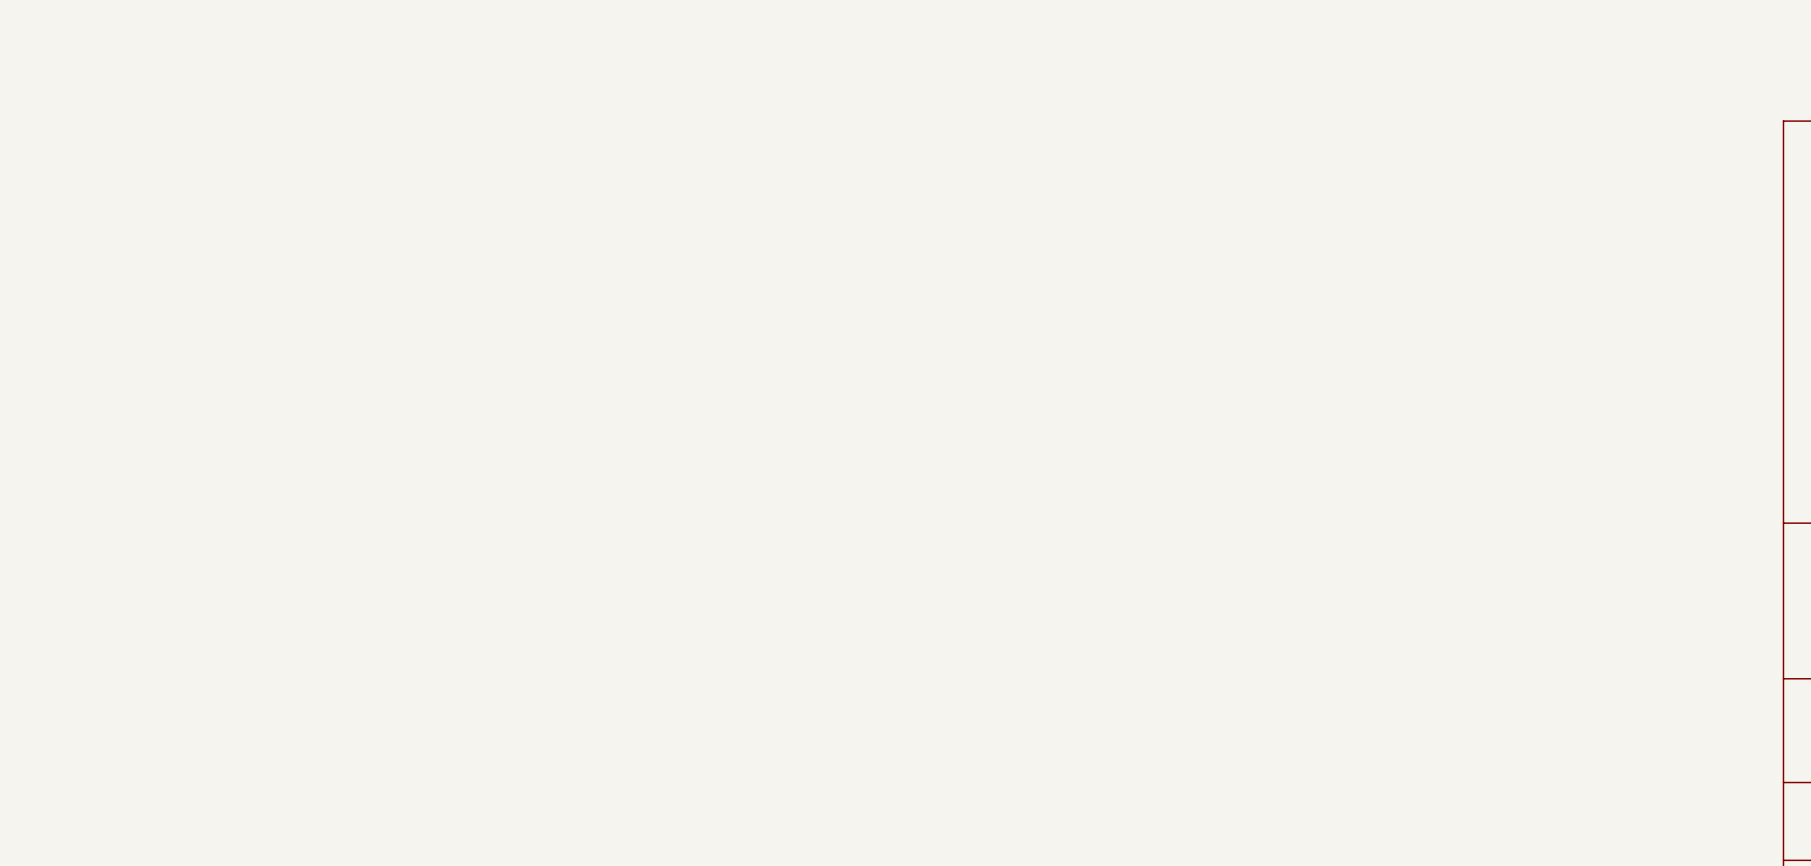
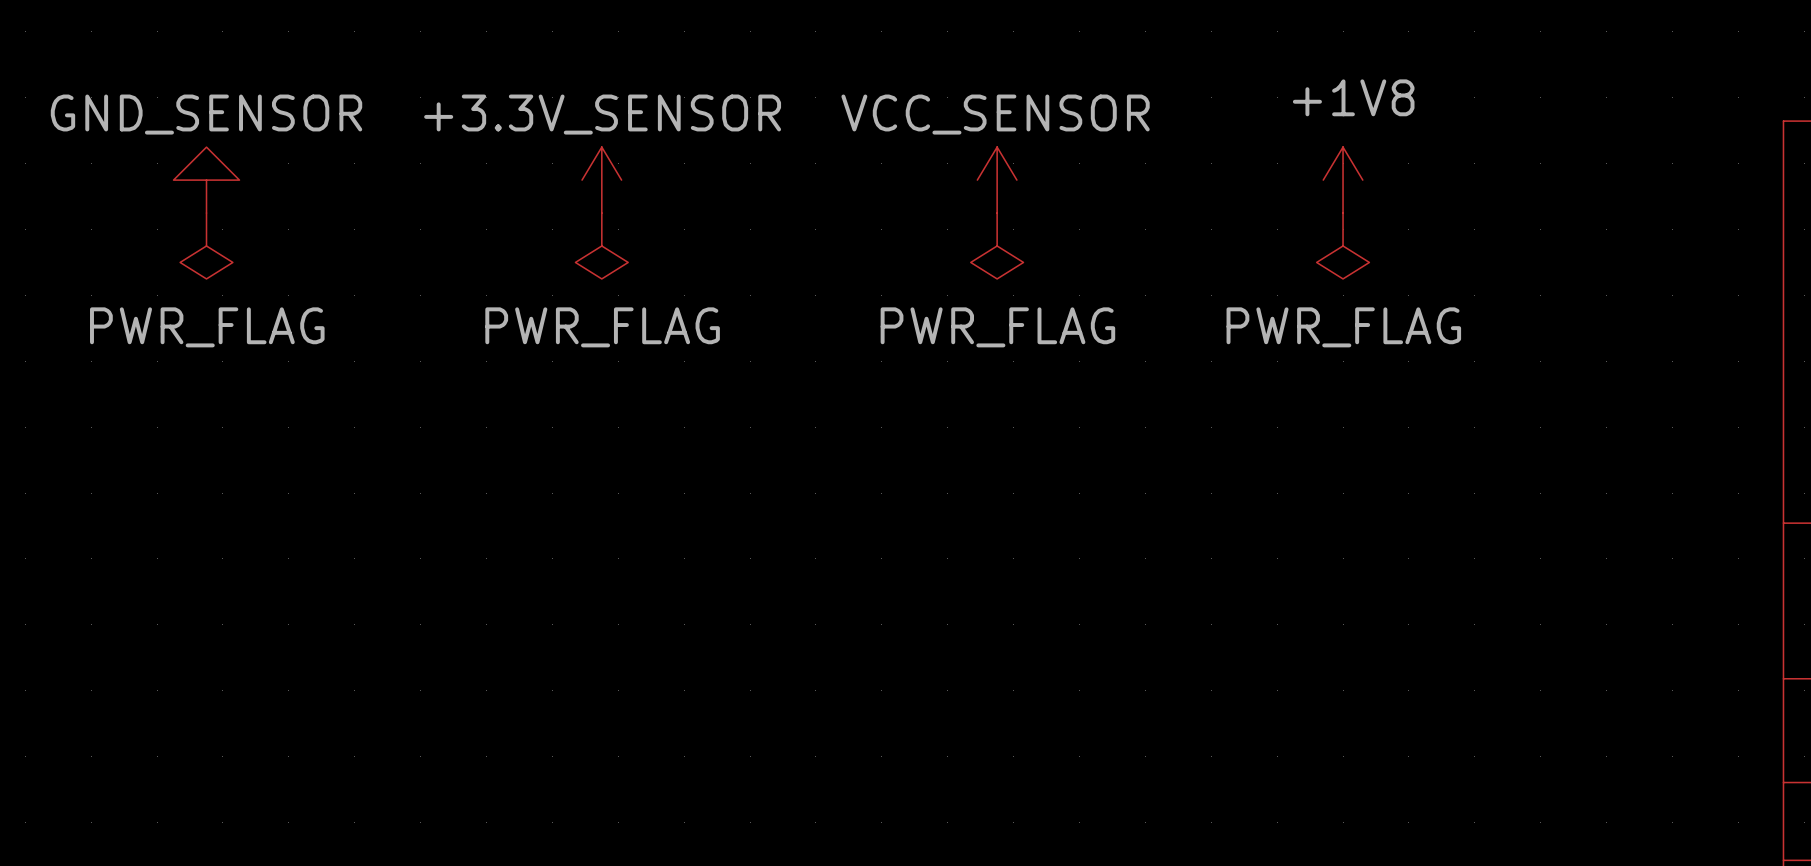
power symbol: none -> GND_SENSOR (206, 180)
power symbol: none -> +3.3V_SENSOR (601, 180)
power symbol: none -> VCC_SENSOR (997, 180)
power symbol: none -> +1V8 (1343, 180)
power symbol: none -> PWR_FLAG (206, 245)
power symbol: none -> PWR_FLAG (601, 245)
power symbol: none -> PWR_FLAG (997, 245)
power symbol: none -> PWR_FLAG (1343, 245)

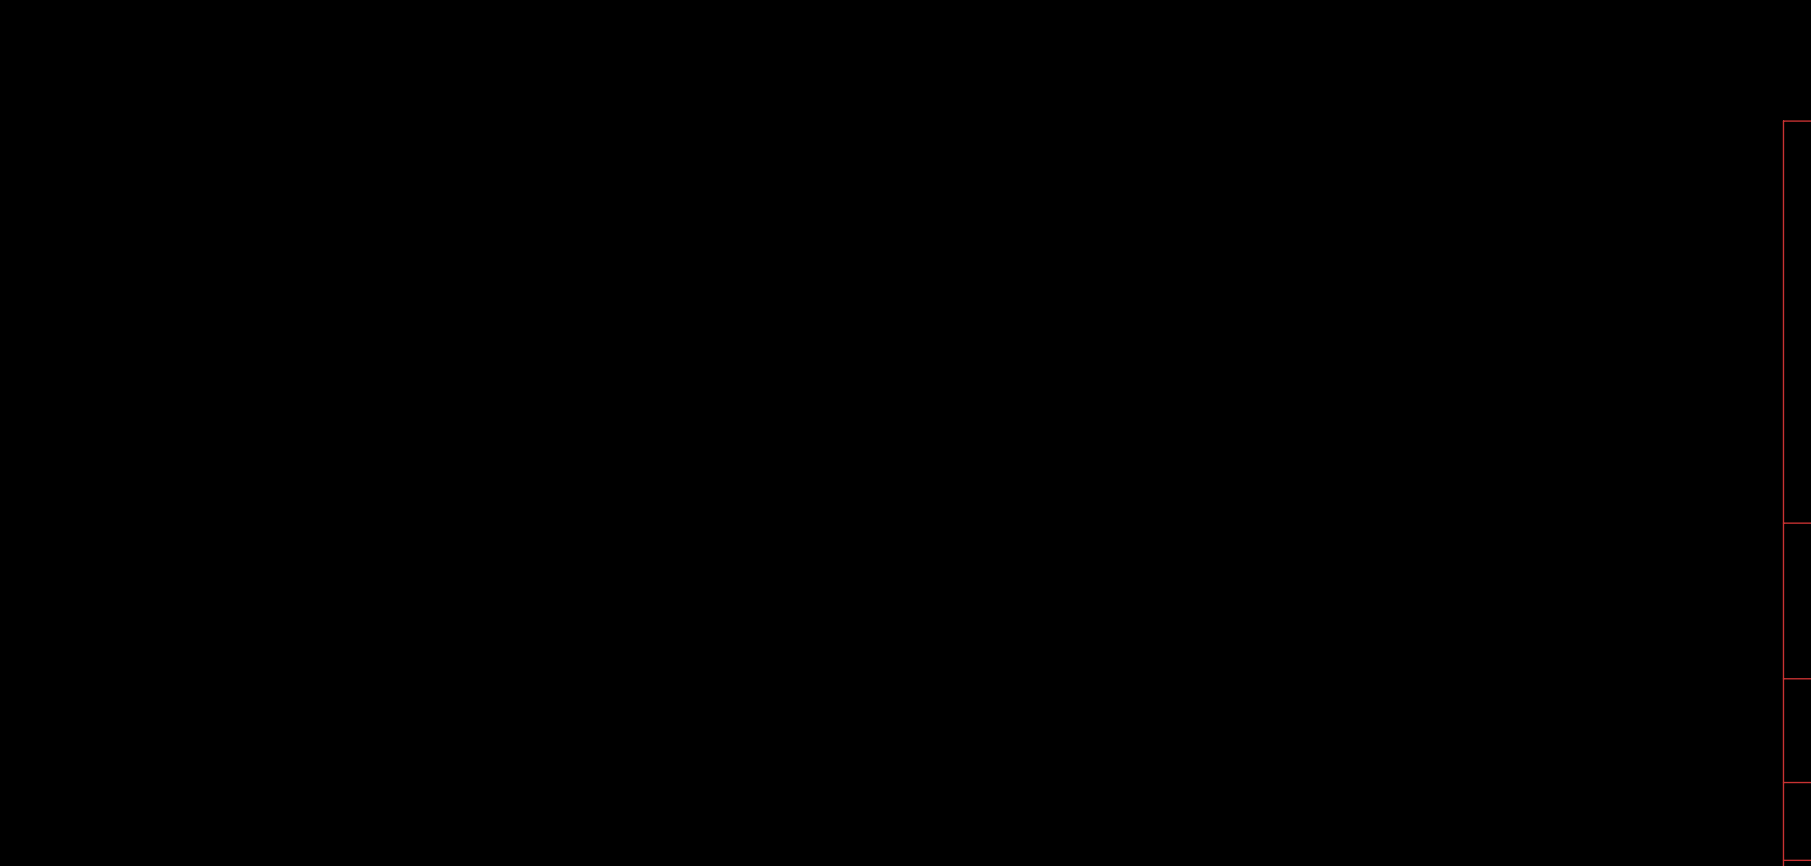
power symbol: GND_SENSOR (206, 180) -> none
power symbol: +3.3V_SENSOR (601, 180) -> none
power symbol: VCC_SENSOR (997, 180) -> none
power symbol: +1V8 (1343, 180) -> none
power symbol: PWR_FLAG (206, 245) -> none
power symbol: PWR_FLAG (601, 245) -> none
power symbol: PWR_FLAG (997, 245) -> none
power symbol: PWR_FLAG (1343, 245) -> none

